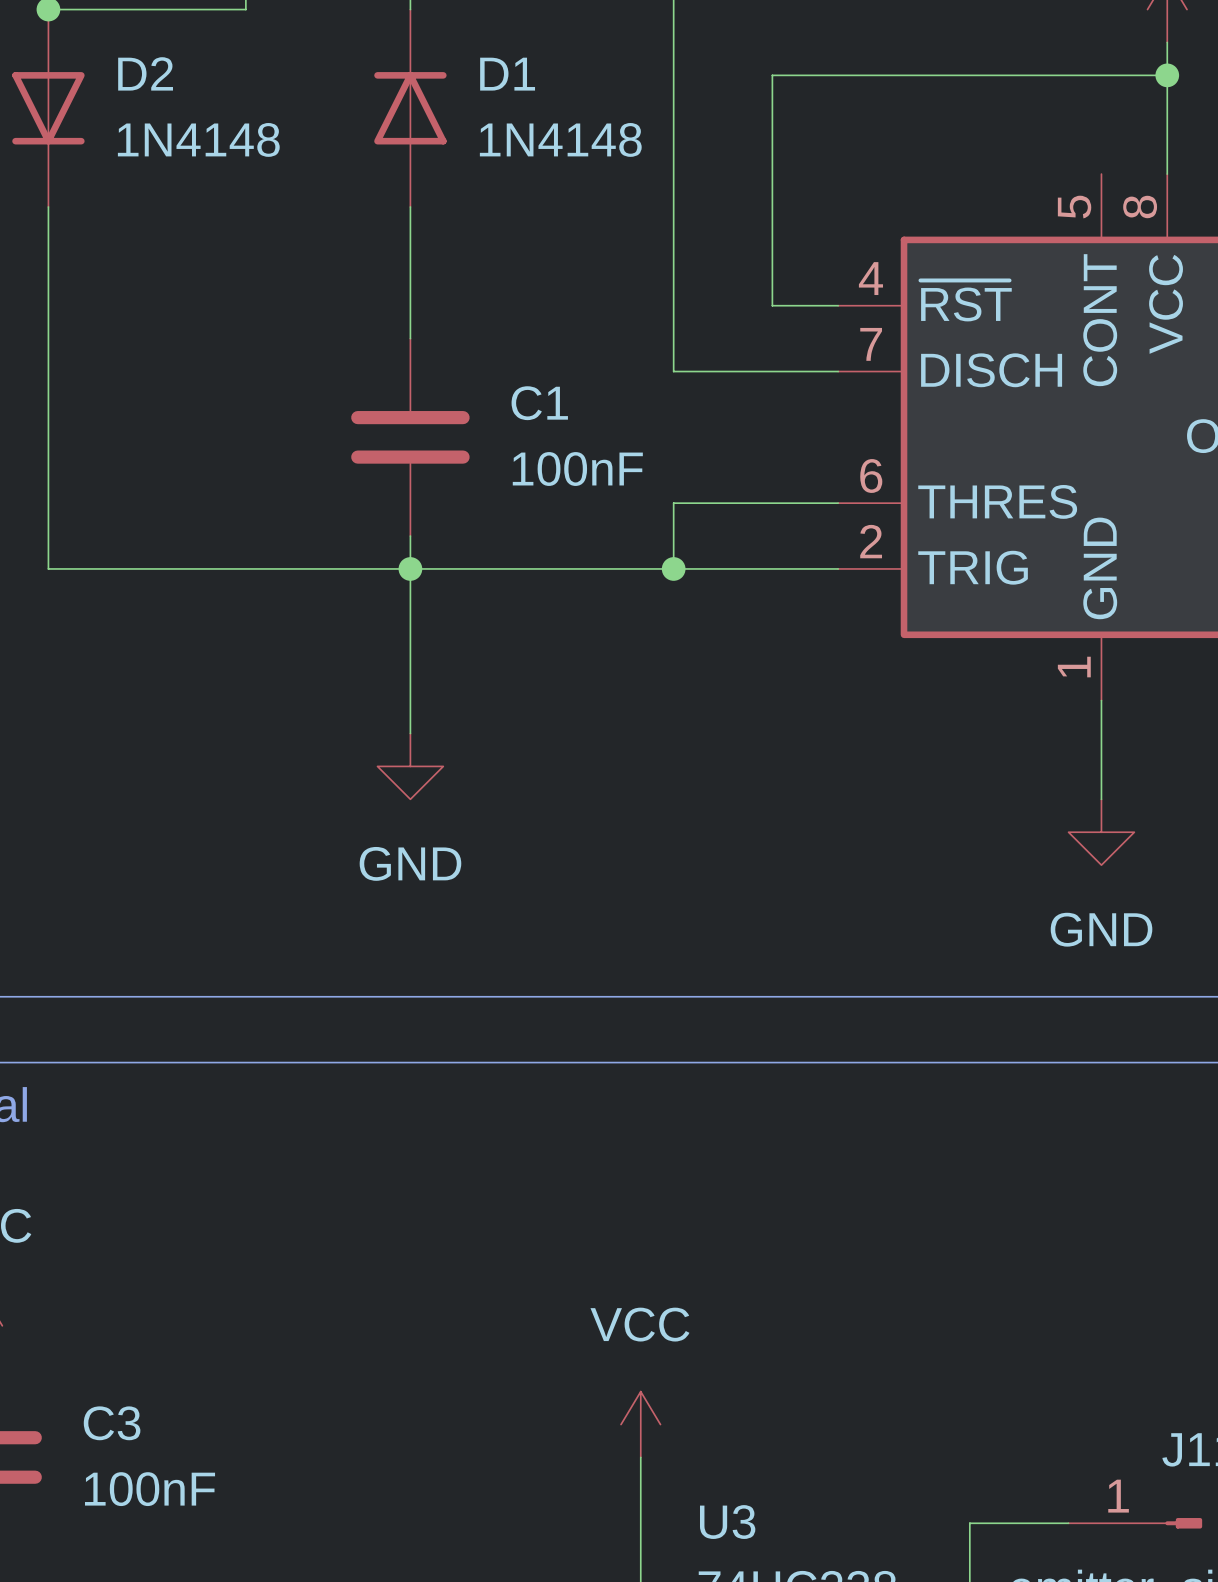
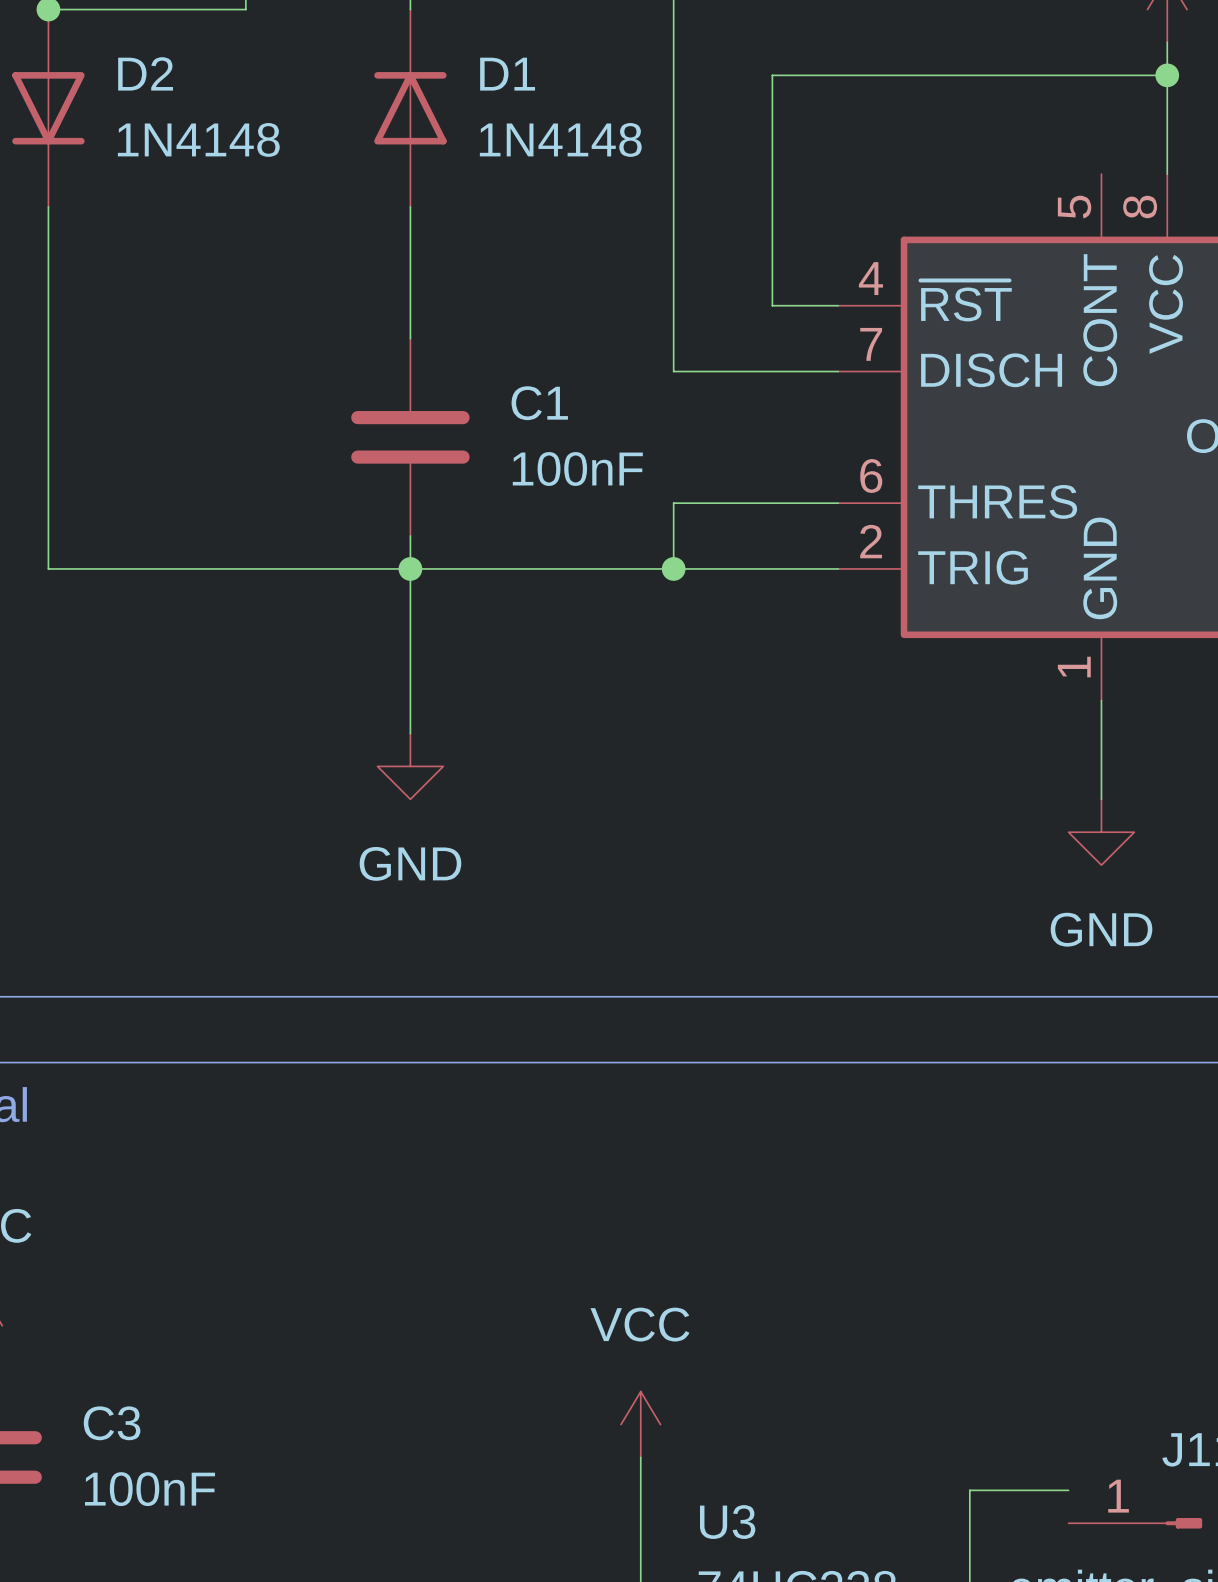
wire: (969, 1523) (1068, 1523) -> (969, 1523) (969, 1490) (1068, 1490)

